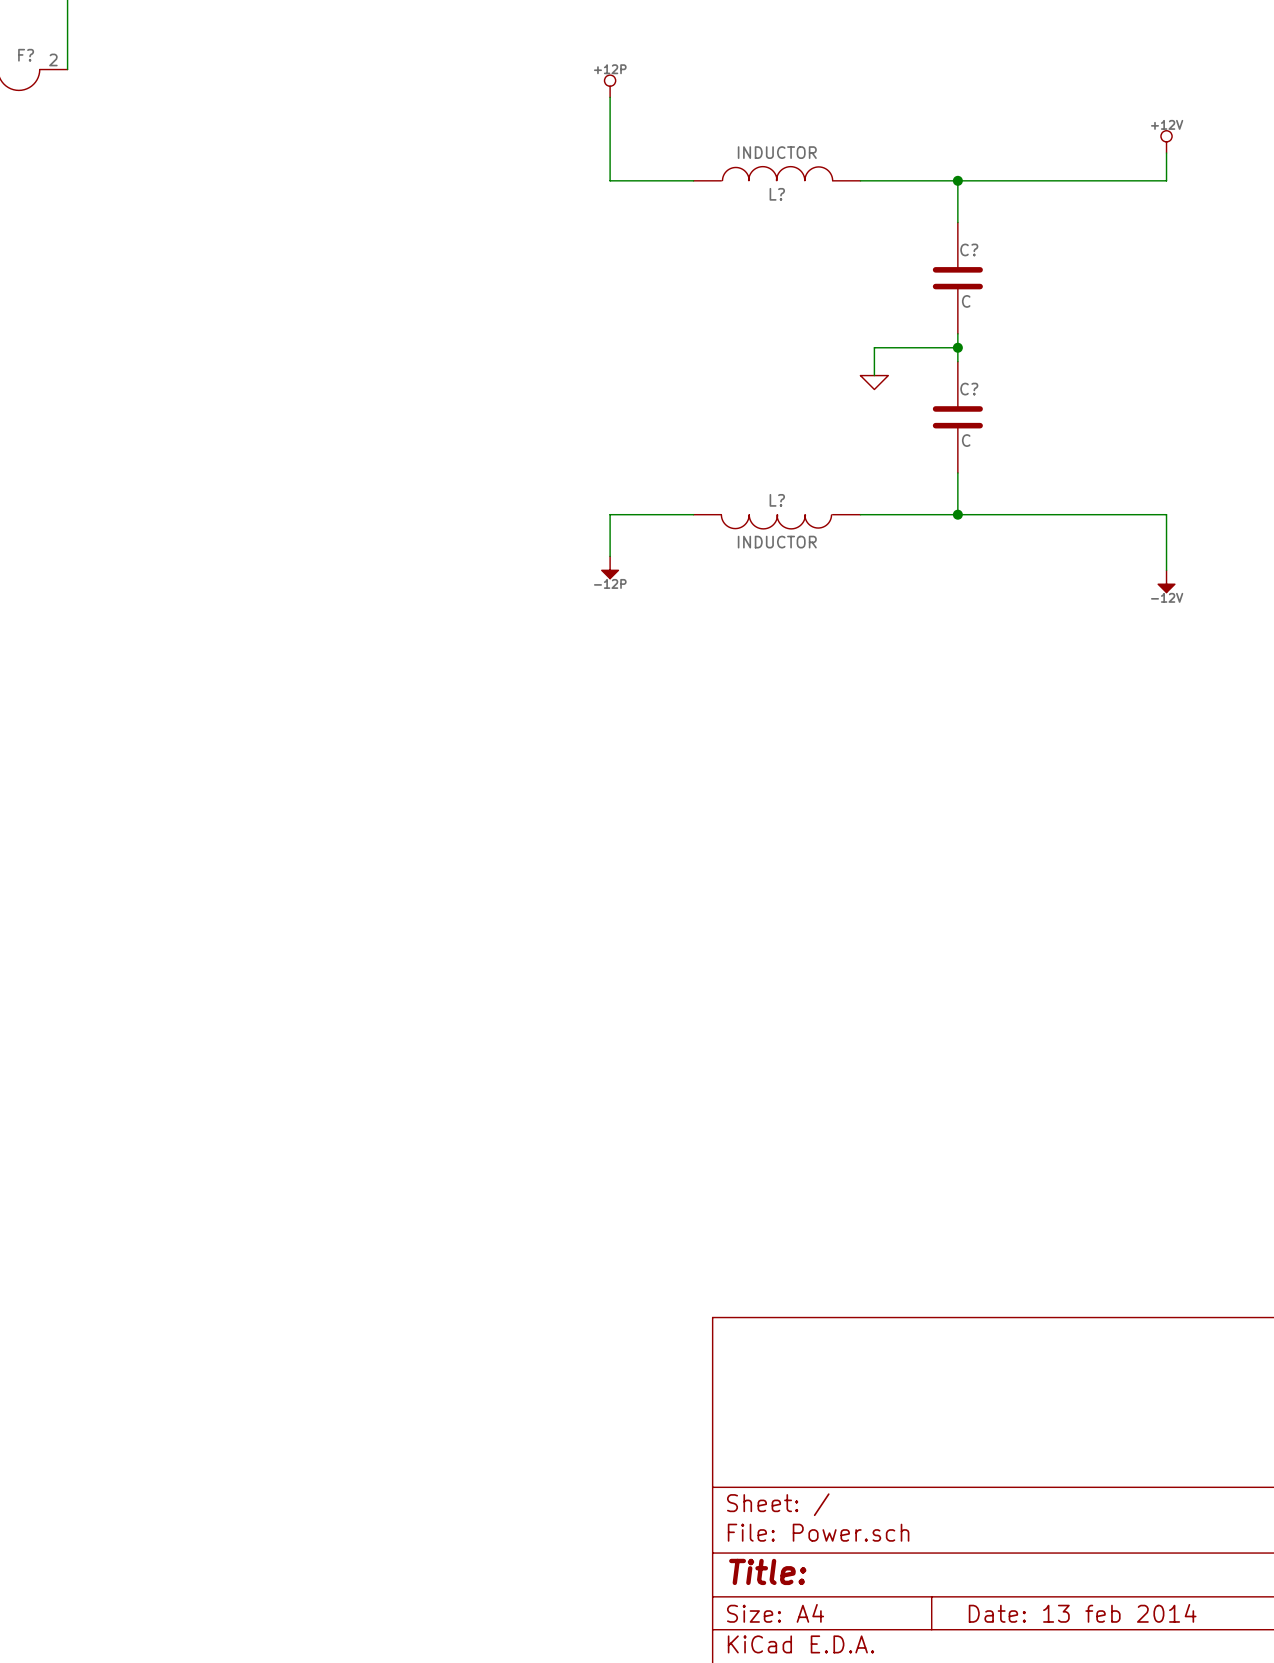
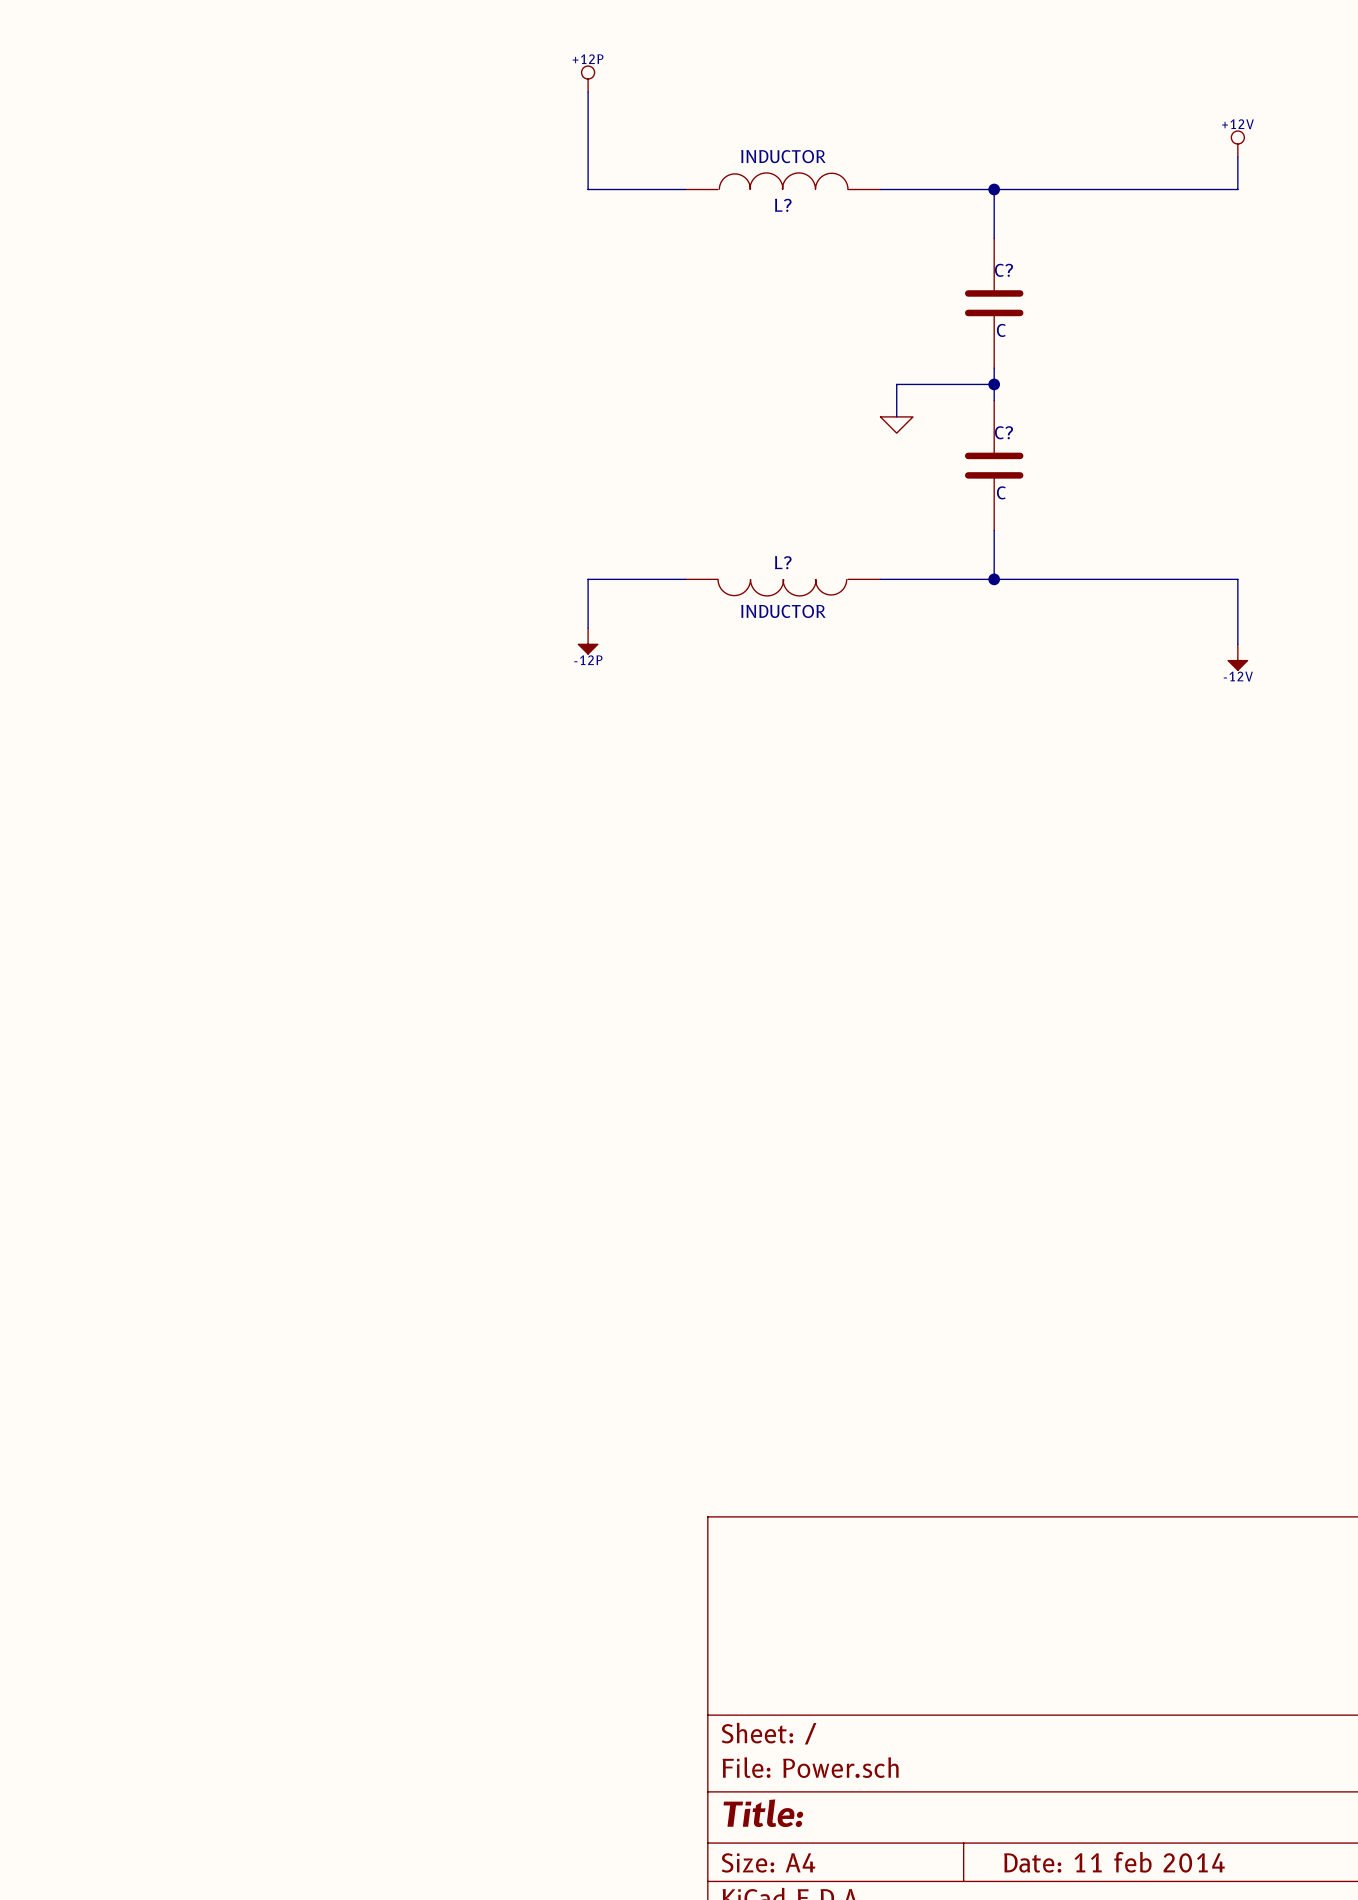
title block: Date: 13 feb 2014 (1082, 1613) -> Date: 11 feb 2014 (1114, 1862)

